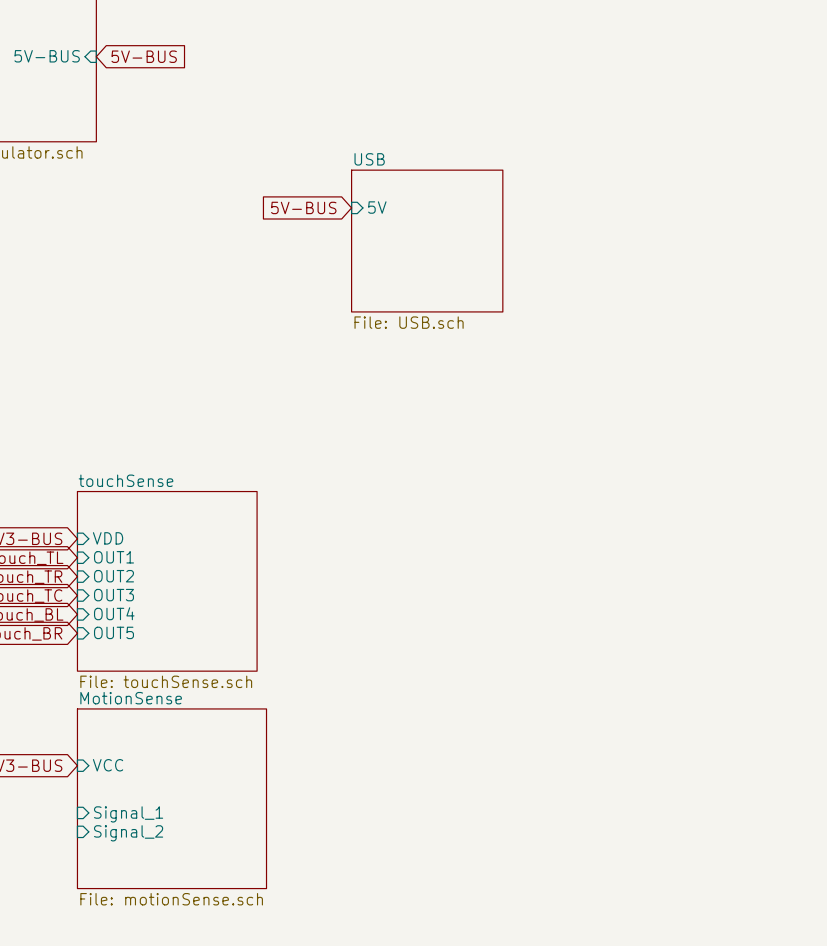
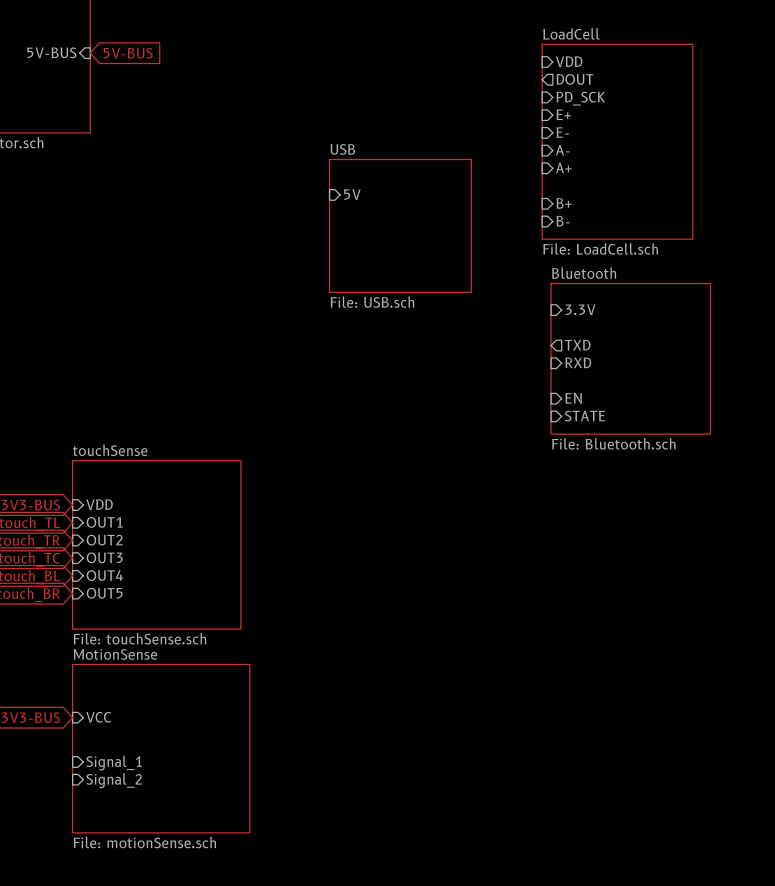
sheet pin: none -> VDD (569, 61)
sheet pin: none -> DOUT (575, 79)
sheet pin: none -> PD_SCK (580, 98)
sheet pin: none -> E+ (563, 114)
sheet pin: none -> E- (562, 132)
sheet LoadCell: none -> File: LoadCell.sch (617, 141)
sheet pin: none -> A- (562, 150)
sheet pin: none -> A+ (563, 167)
global label: 5V-BUS (303, 207) -> none
sheet pin: none -> B+ (564, 203)
sheet pin: none -> B- (563, 221)
sheet pin: none -> 3.3V (580, 309)
sheet pin: none -> TXD (577, 345)
sheet Bluetooth: none -> File: Bluetooth.sch (630, 358)
sheet pin: none -> RXD (578, 362)
sheet pin: none -> EN (573, 398)
sheet pin: none -> STATE (585, 416)

